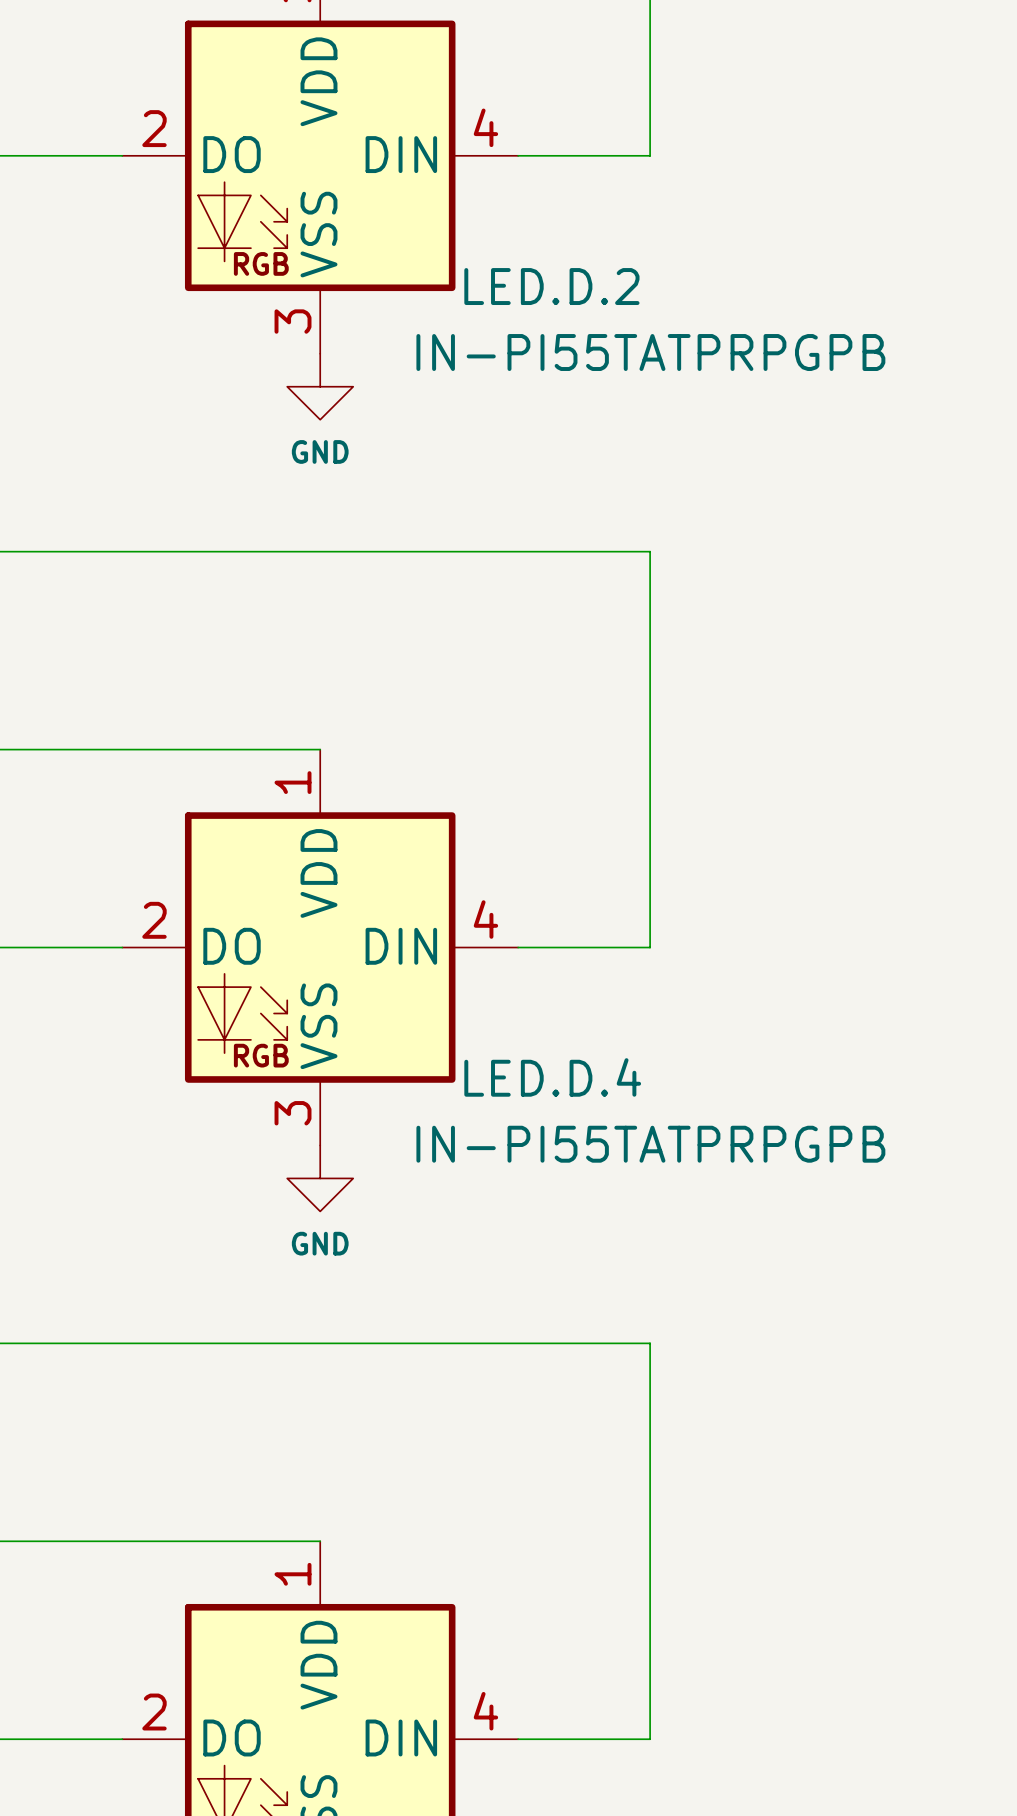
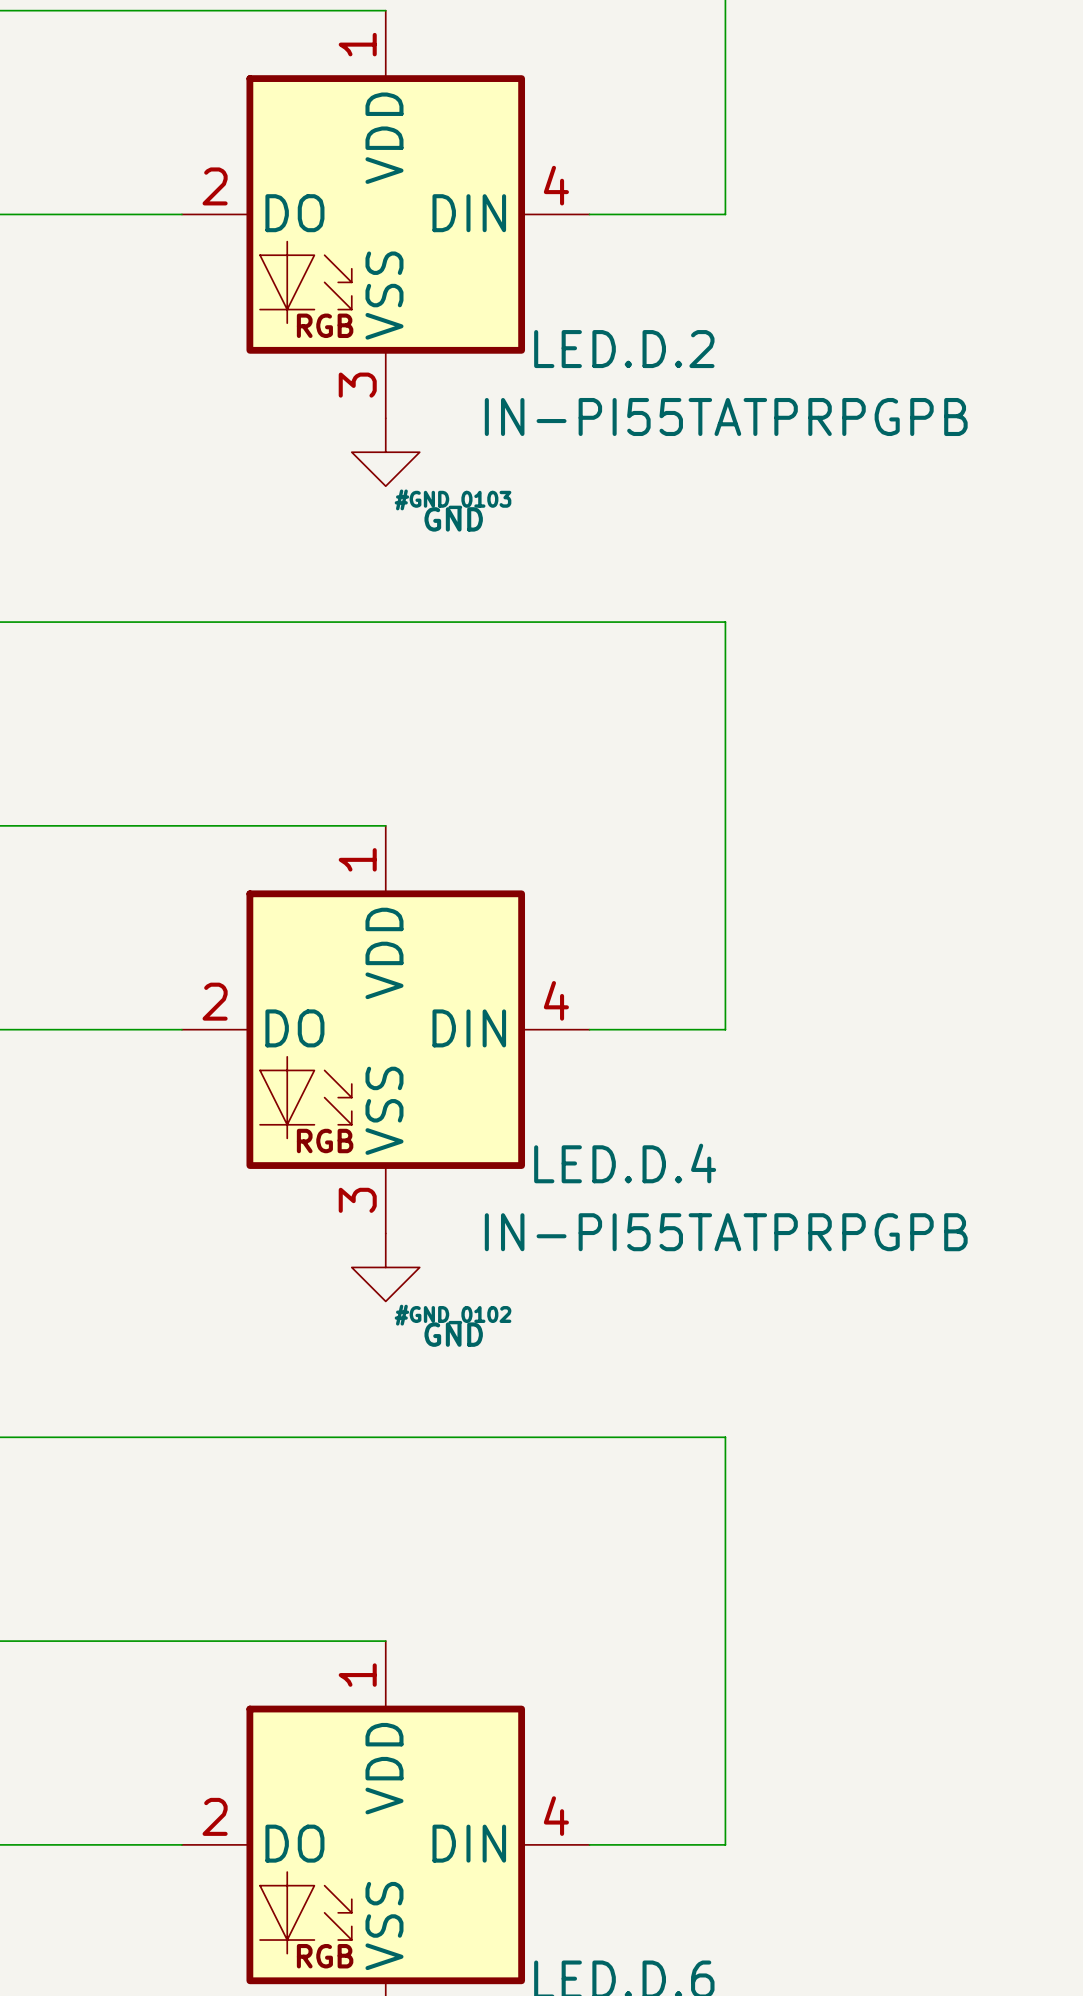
#GND_0103 name: none -> #GND_0103 (453, 499)
#GND_0103 text position: GND (320, 451) -> GND (453, 519)
#GND_0102 name: none -> #GND_0102 (453, 1315)
#GND_0102 text position: GND (320, 1243) -> GND (453, 1334)

